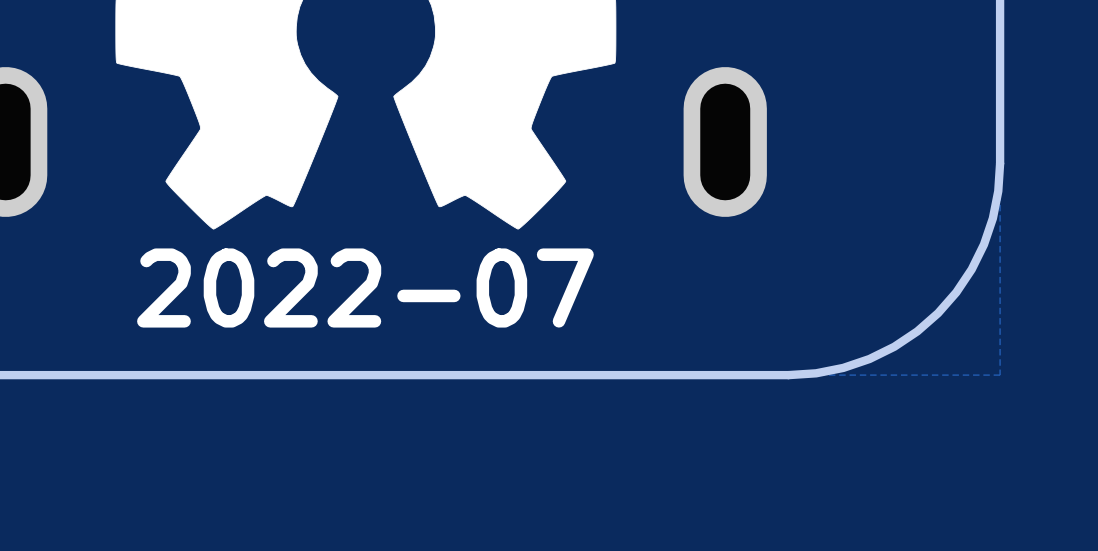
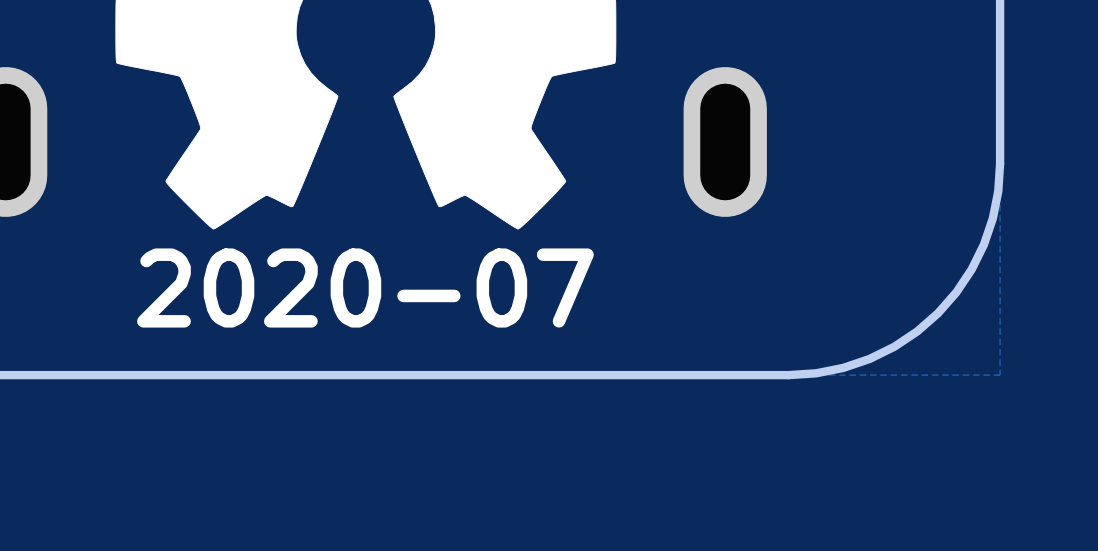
text: 2022-07 (365, 288) -> 2020-07 (365, 288)

